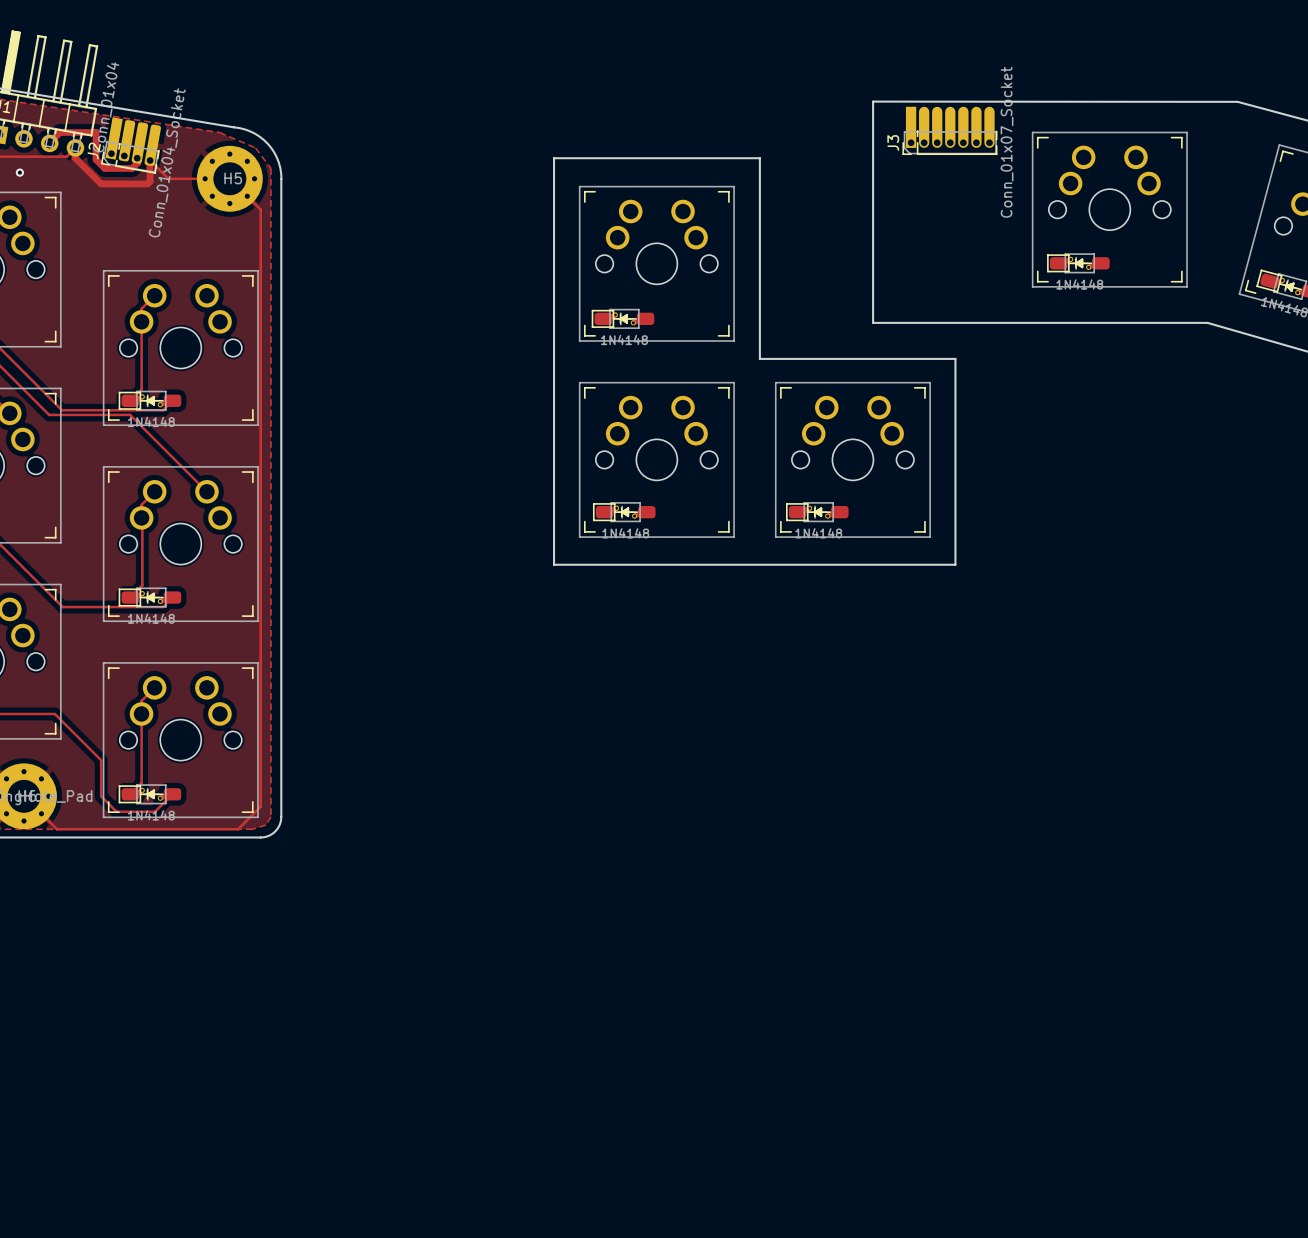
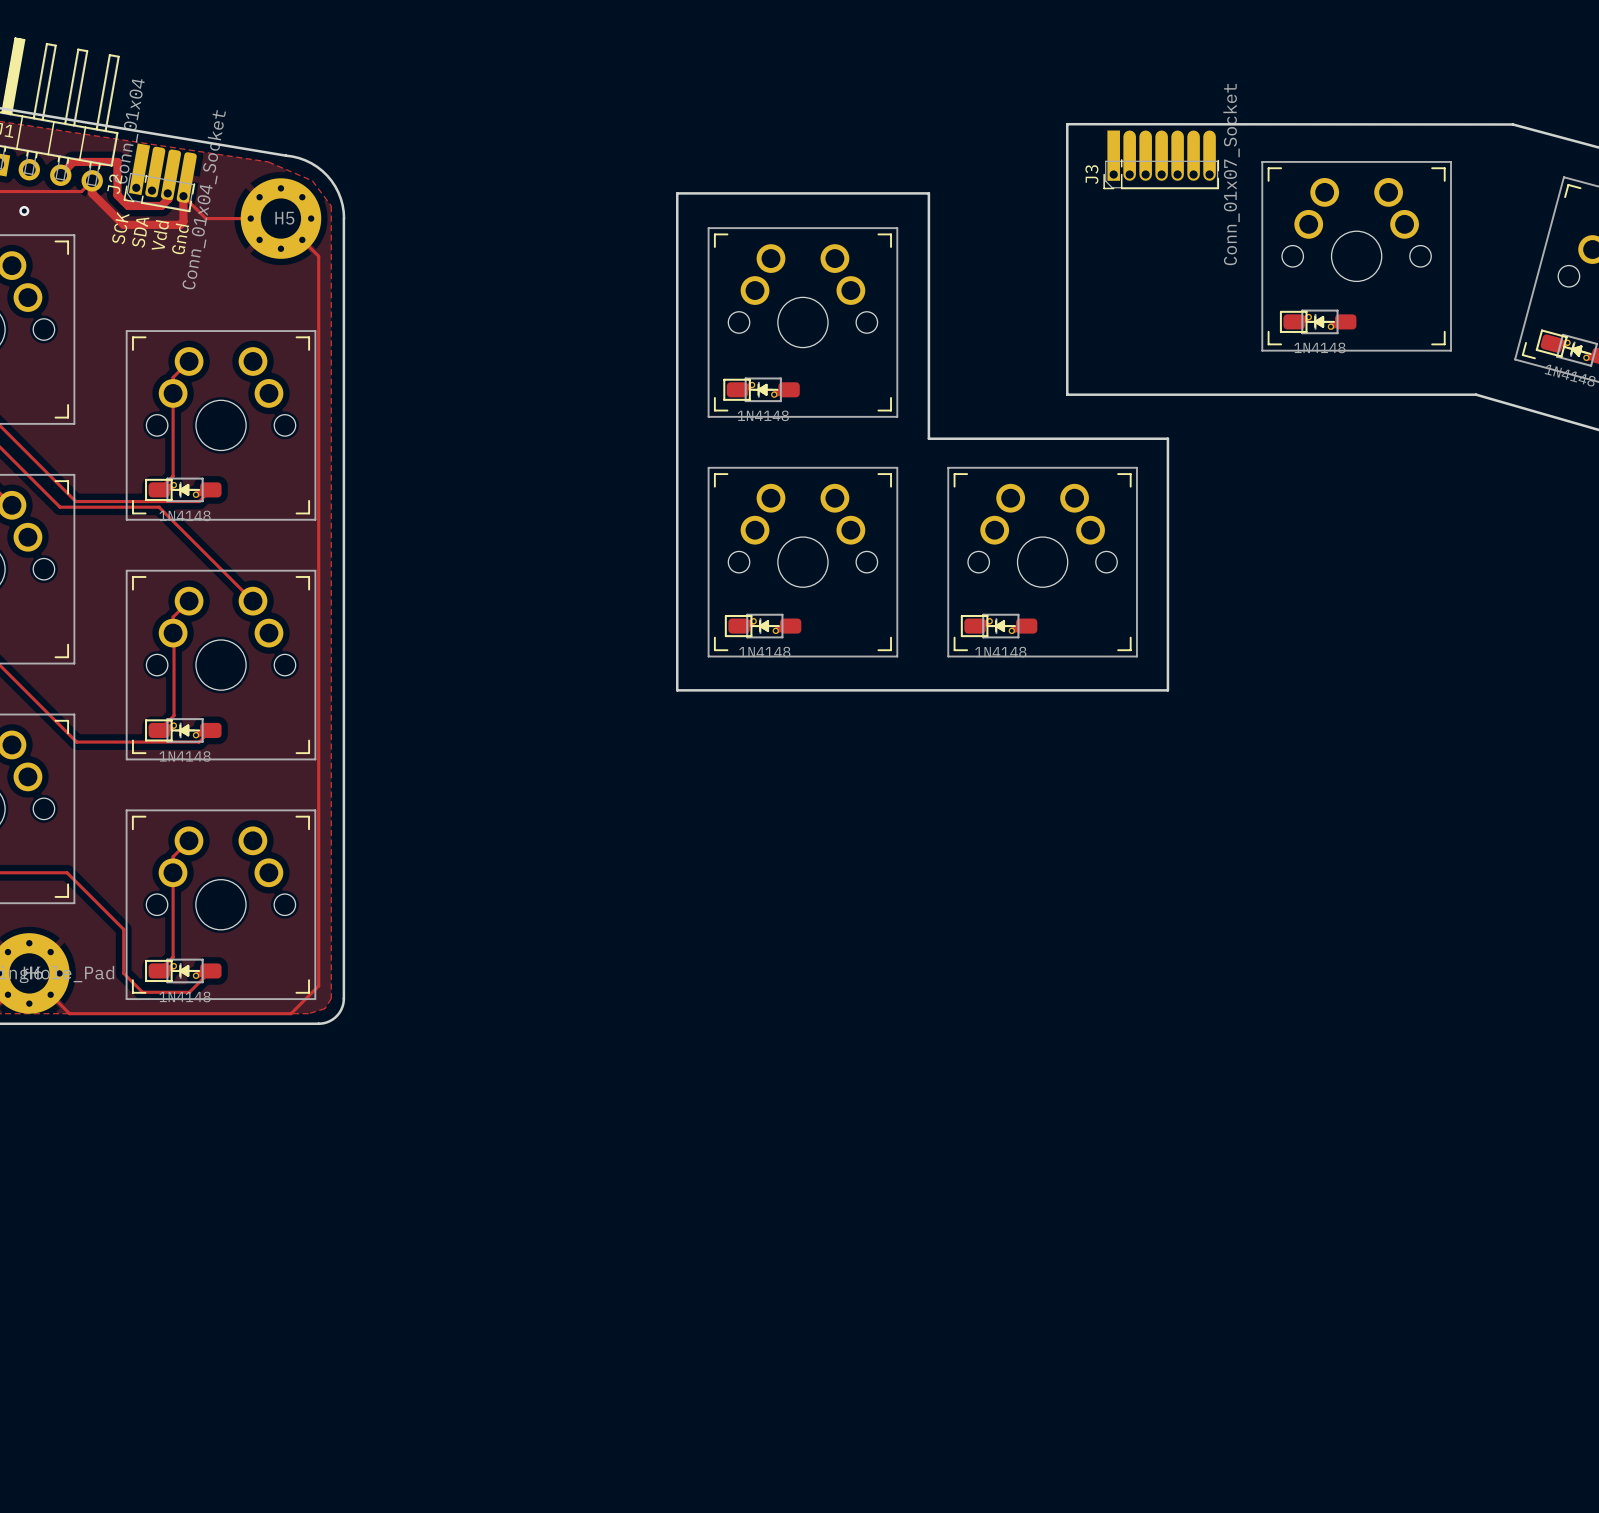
text: none -> SCK (120, 228)
text: none -> SDA (140, 232)
text: none -> Vdd (160, 234)
text: none -> Gnd (180, 238)

